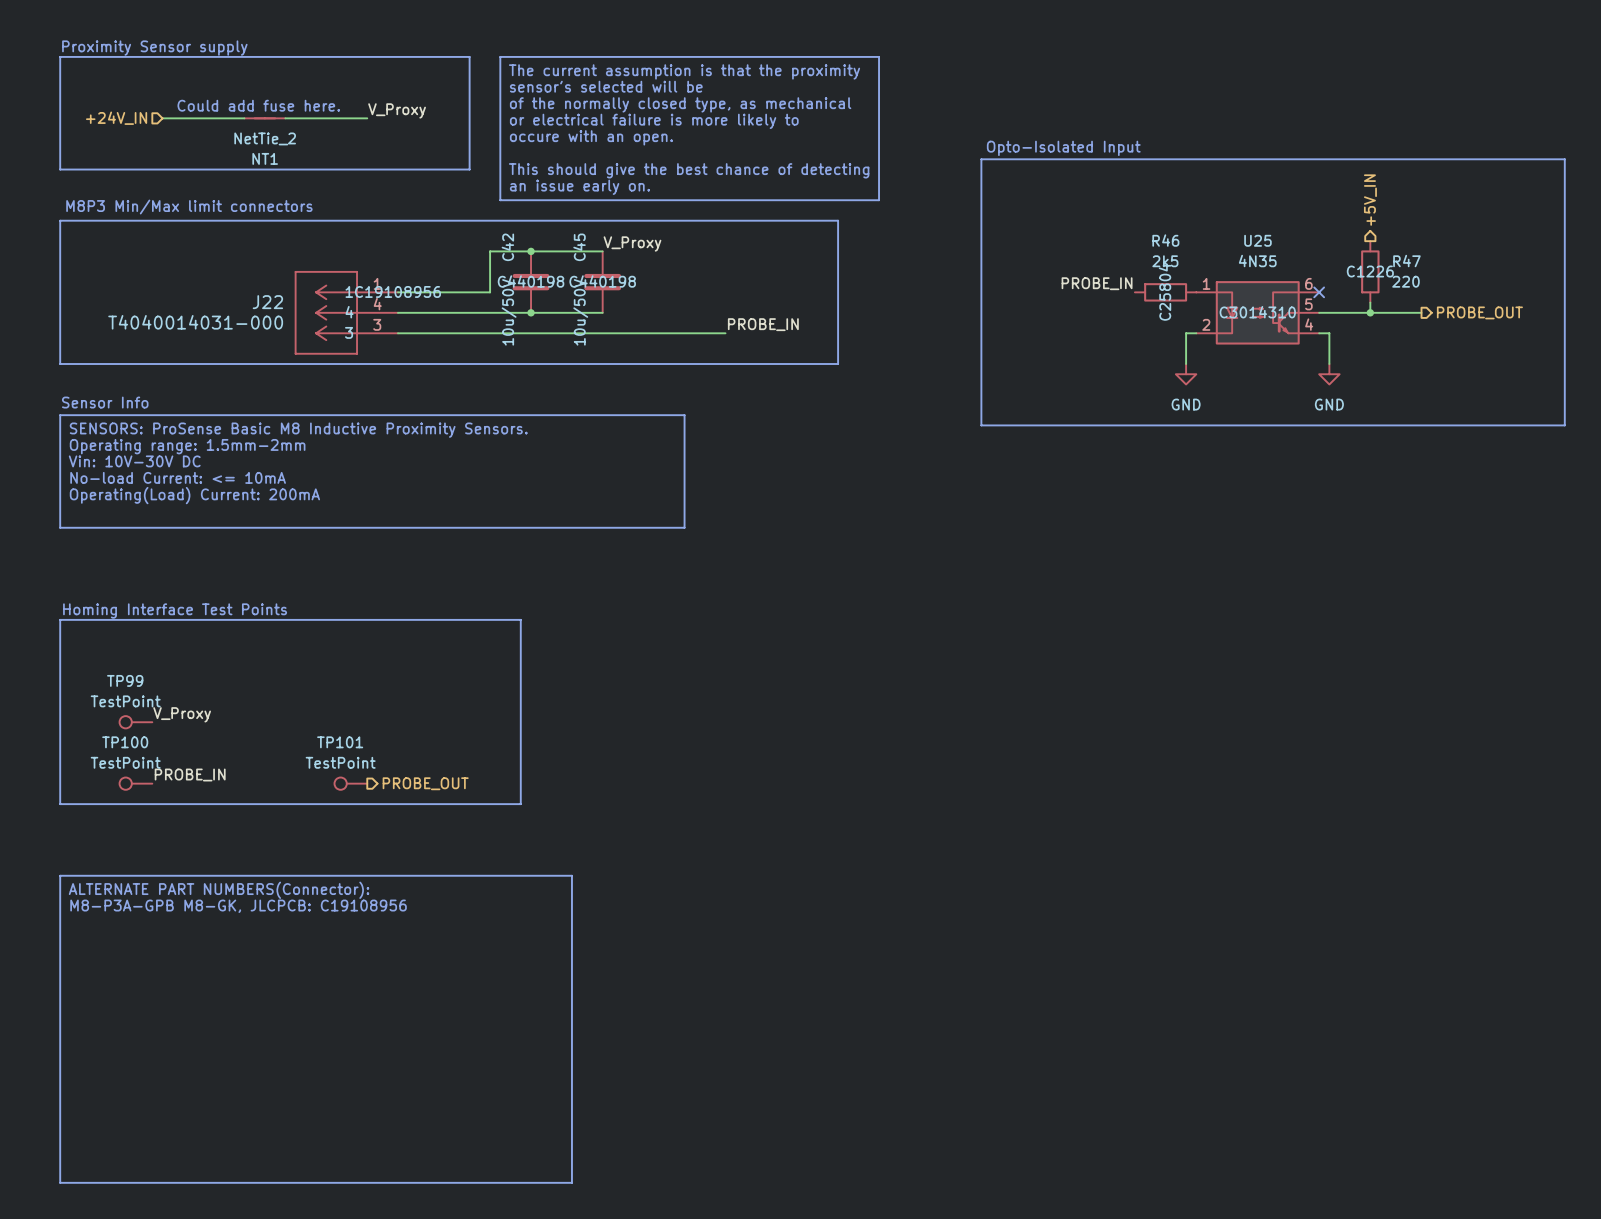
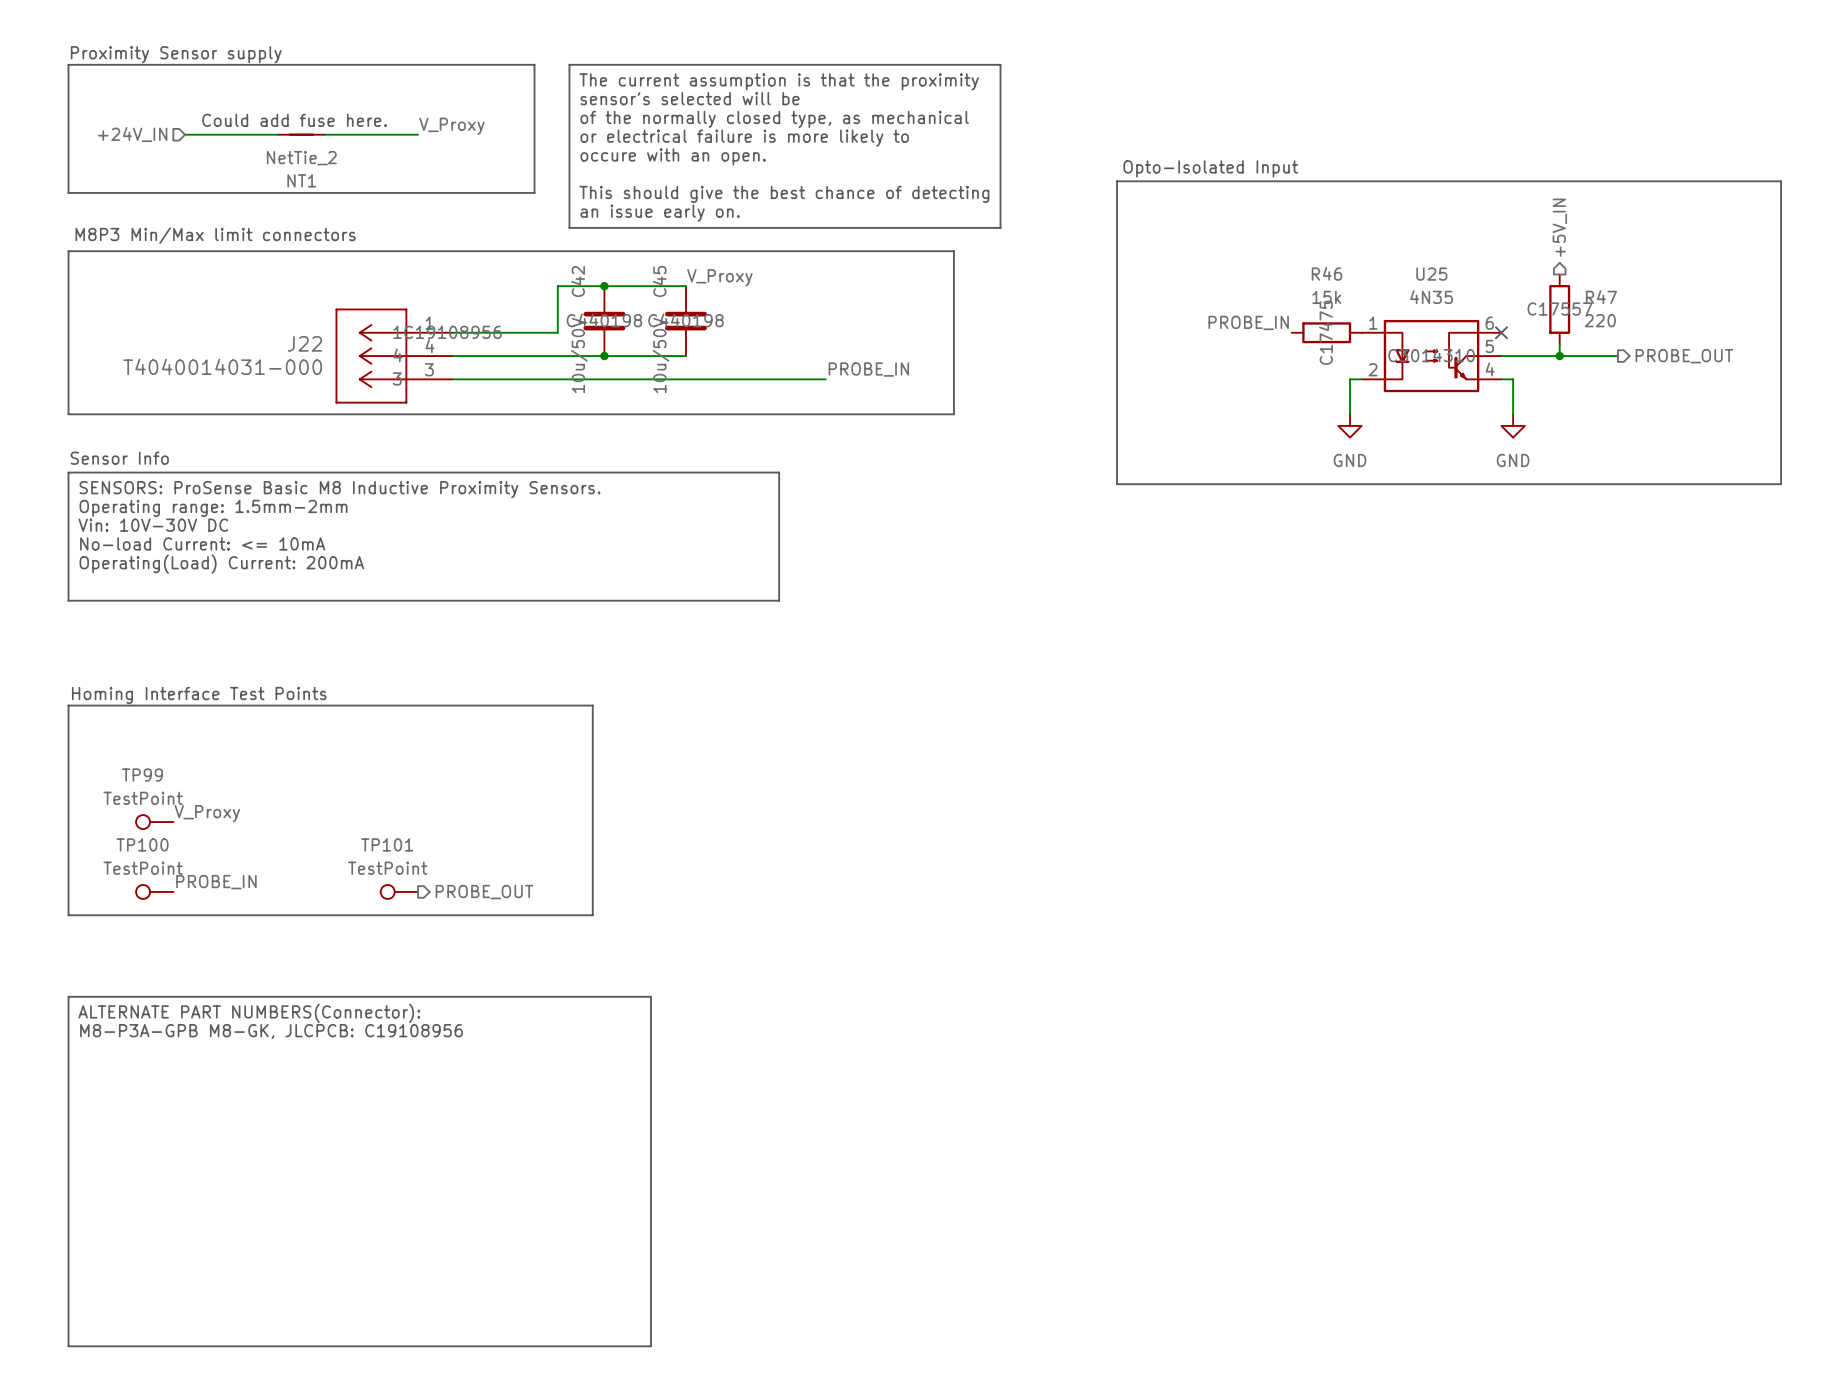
R46 value: 2k5 (1165, 261) -> 15k (1326, 297)
R47 text: C1226 (1370, 271) -> C17557 (1559, 309)
R46 text: C25804 (1164, 292) -> C17475 (1325, 332)

